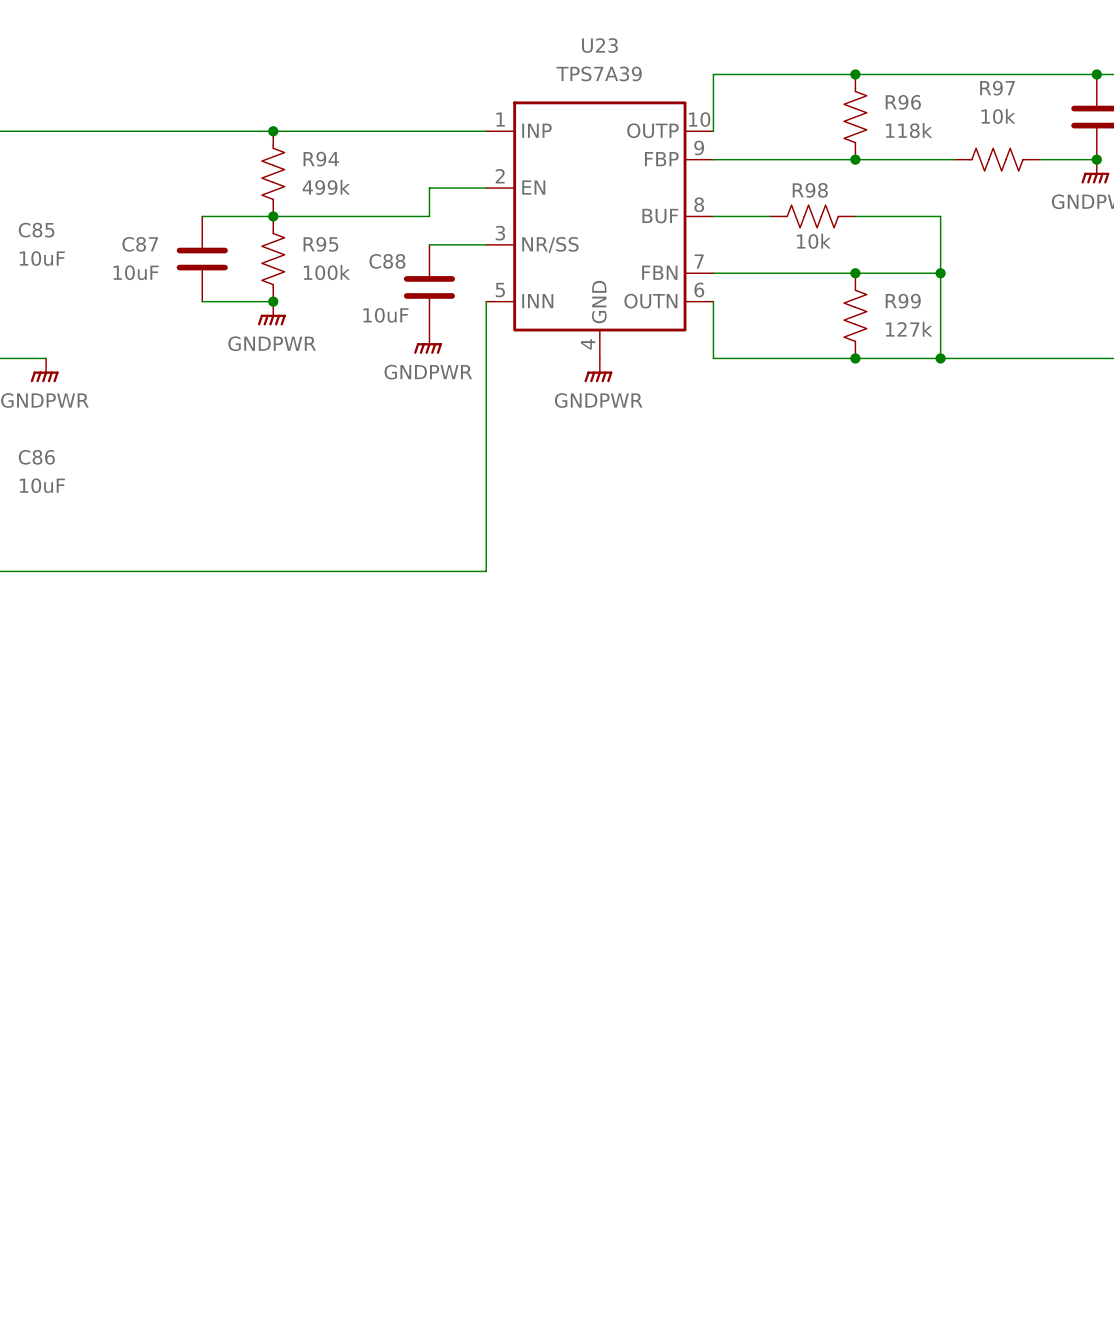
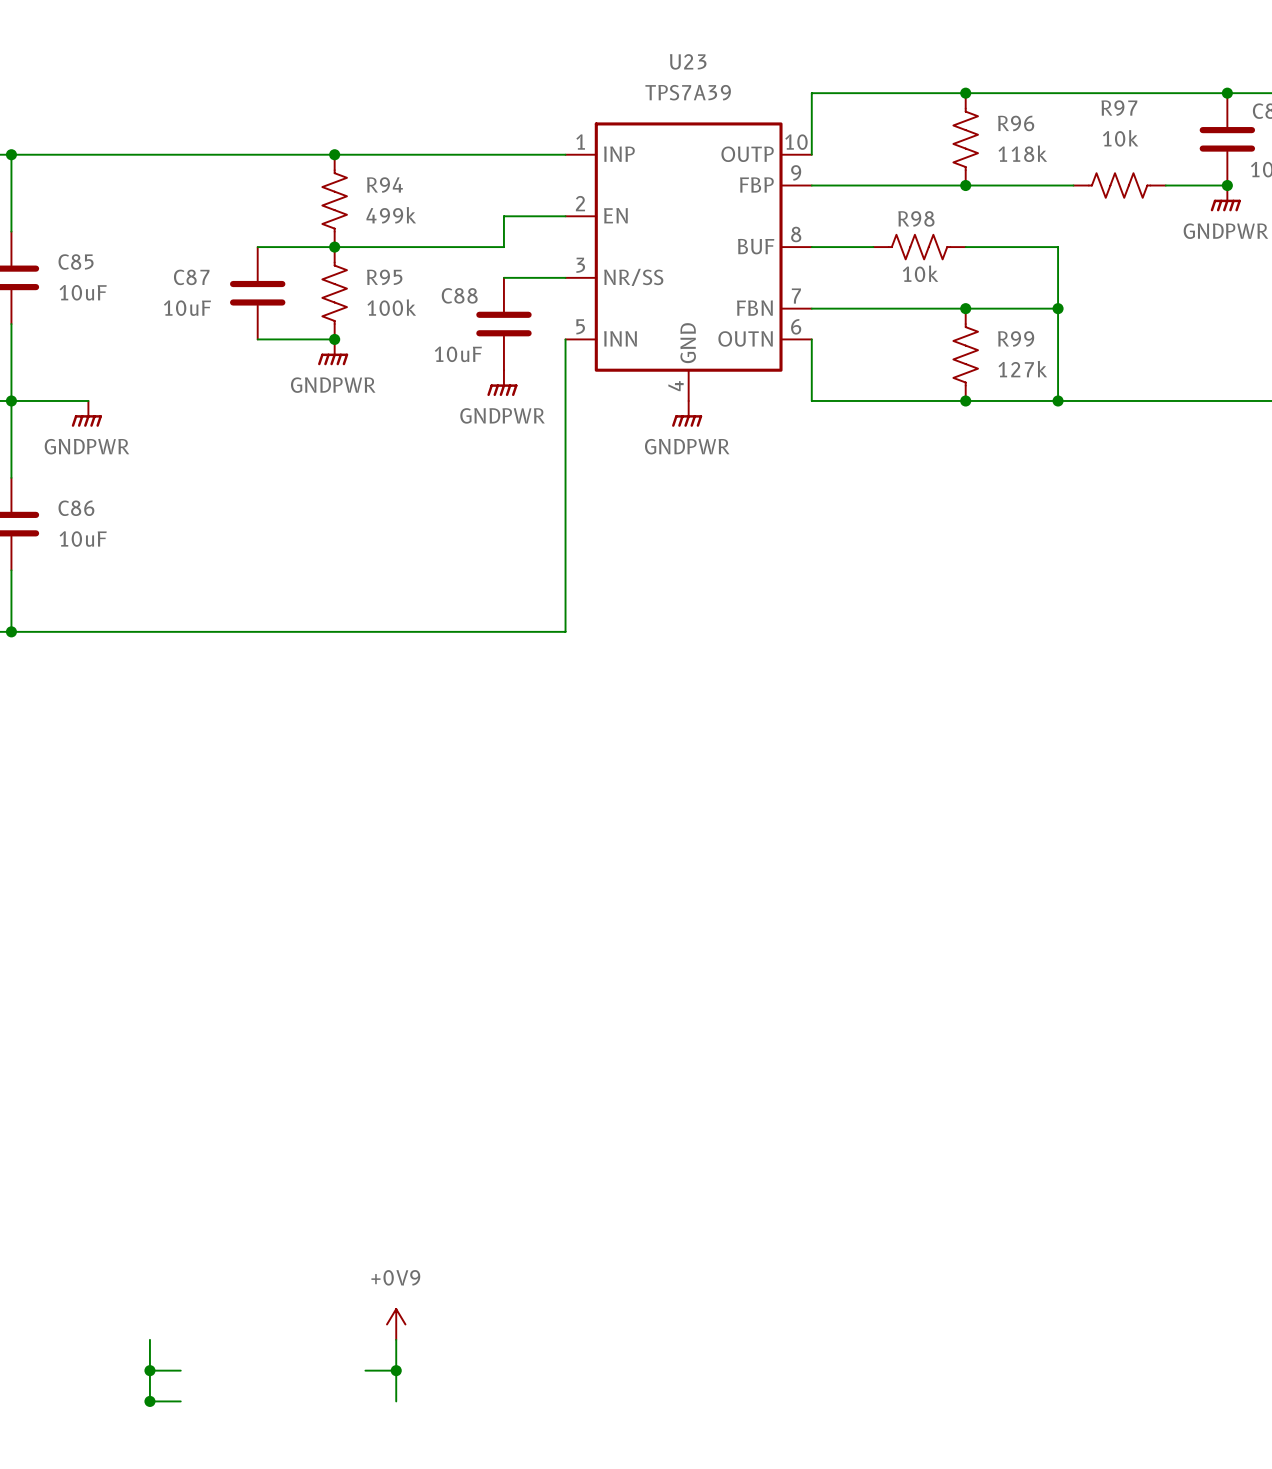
power symbol: none -> +0V9 (396, 1324)
wire: none -> (149, 1339) (149, 1401) (180, 1401)
wire: none -> (396, 1339) (396, 1401)
wire: none -> (149, 1370) (180, 1370)
junction: none -> (149, 1370)
wire: none -> (365, 1370) (396, 1370)
junction: none -> (396, 1370)
junction: none -> (149, 1401)

